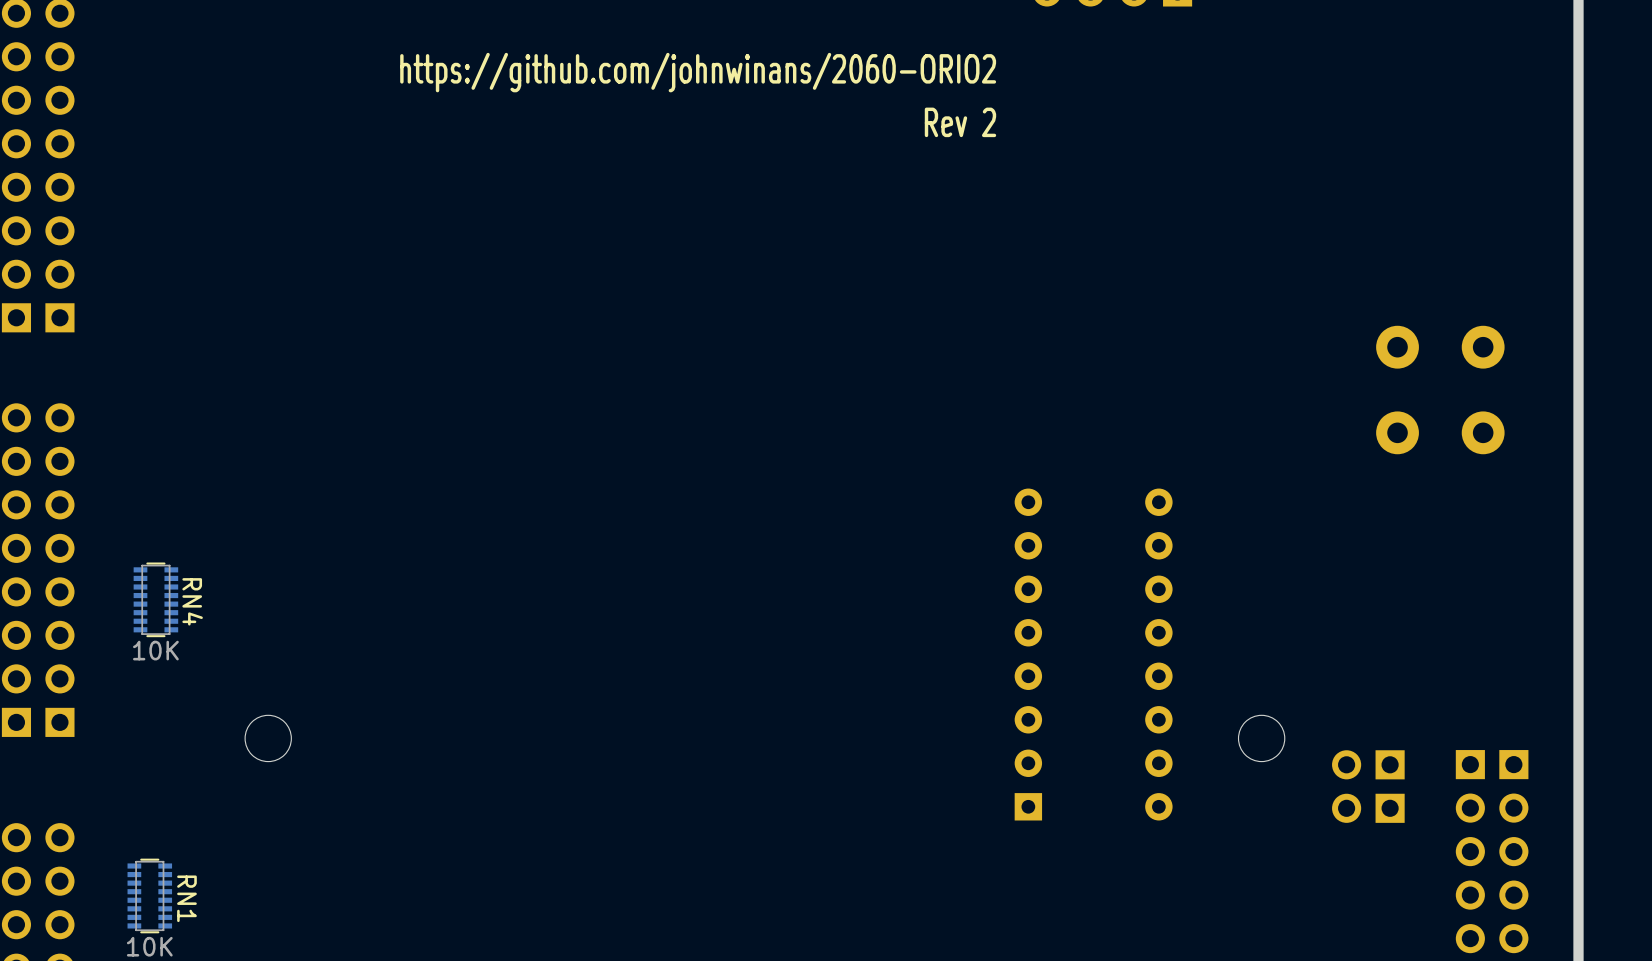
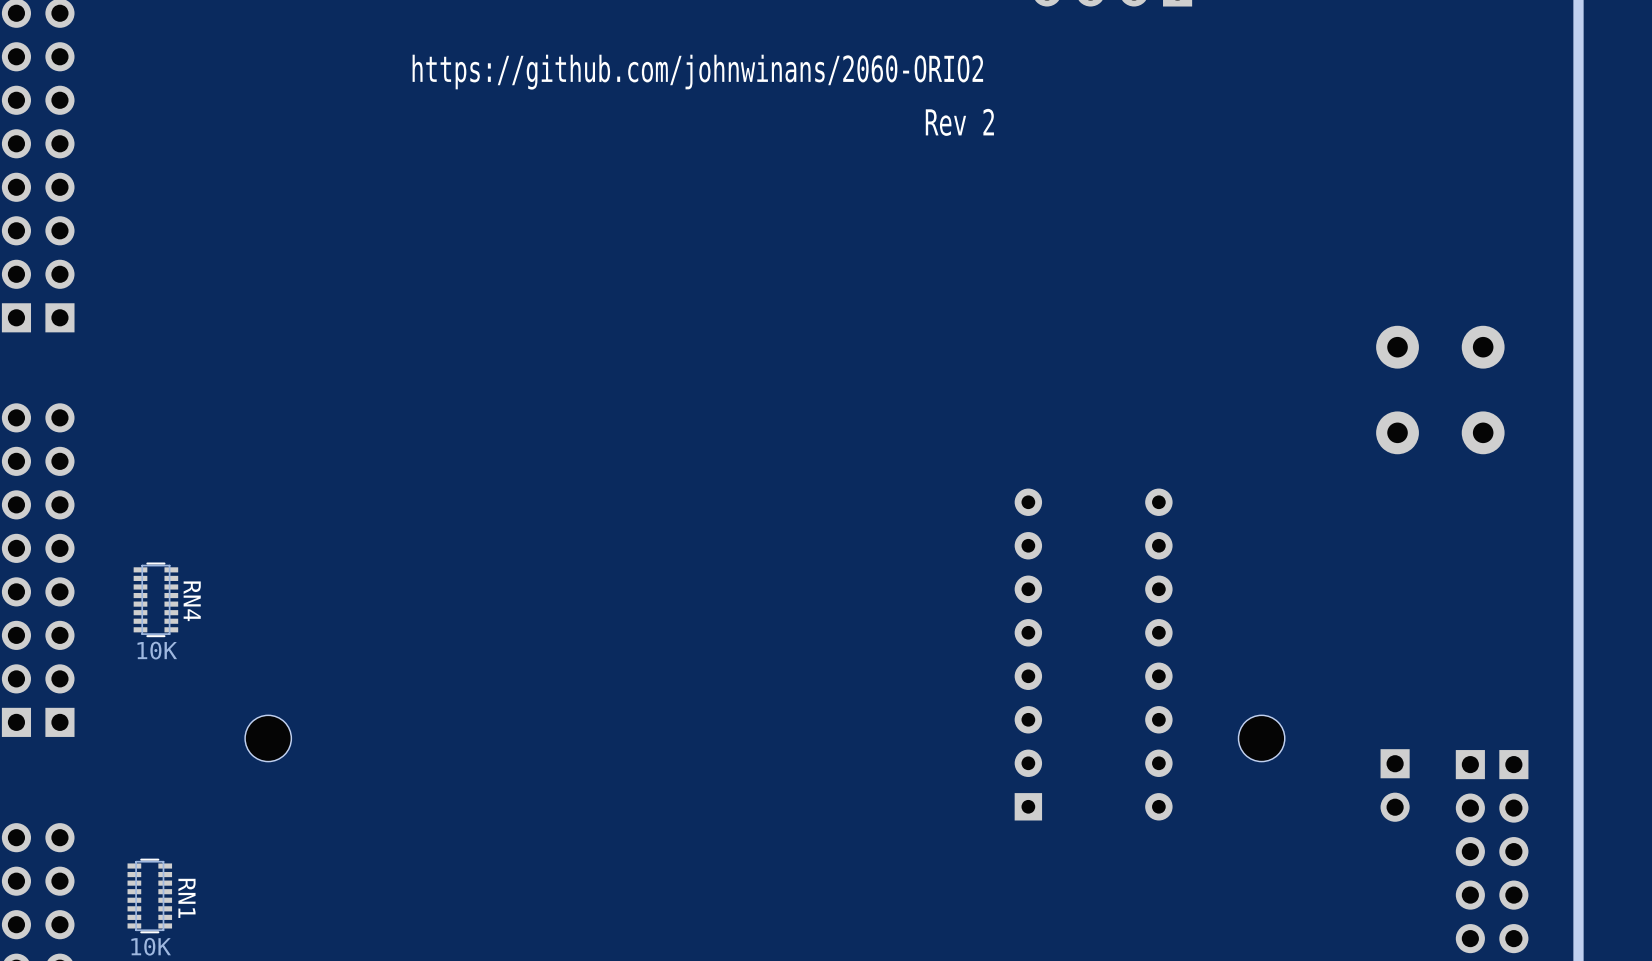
part: (1368, 764) -> none
part: none -> (1395, 785)
part: (1368, 808) -> none

